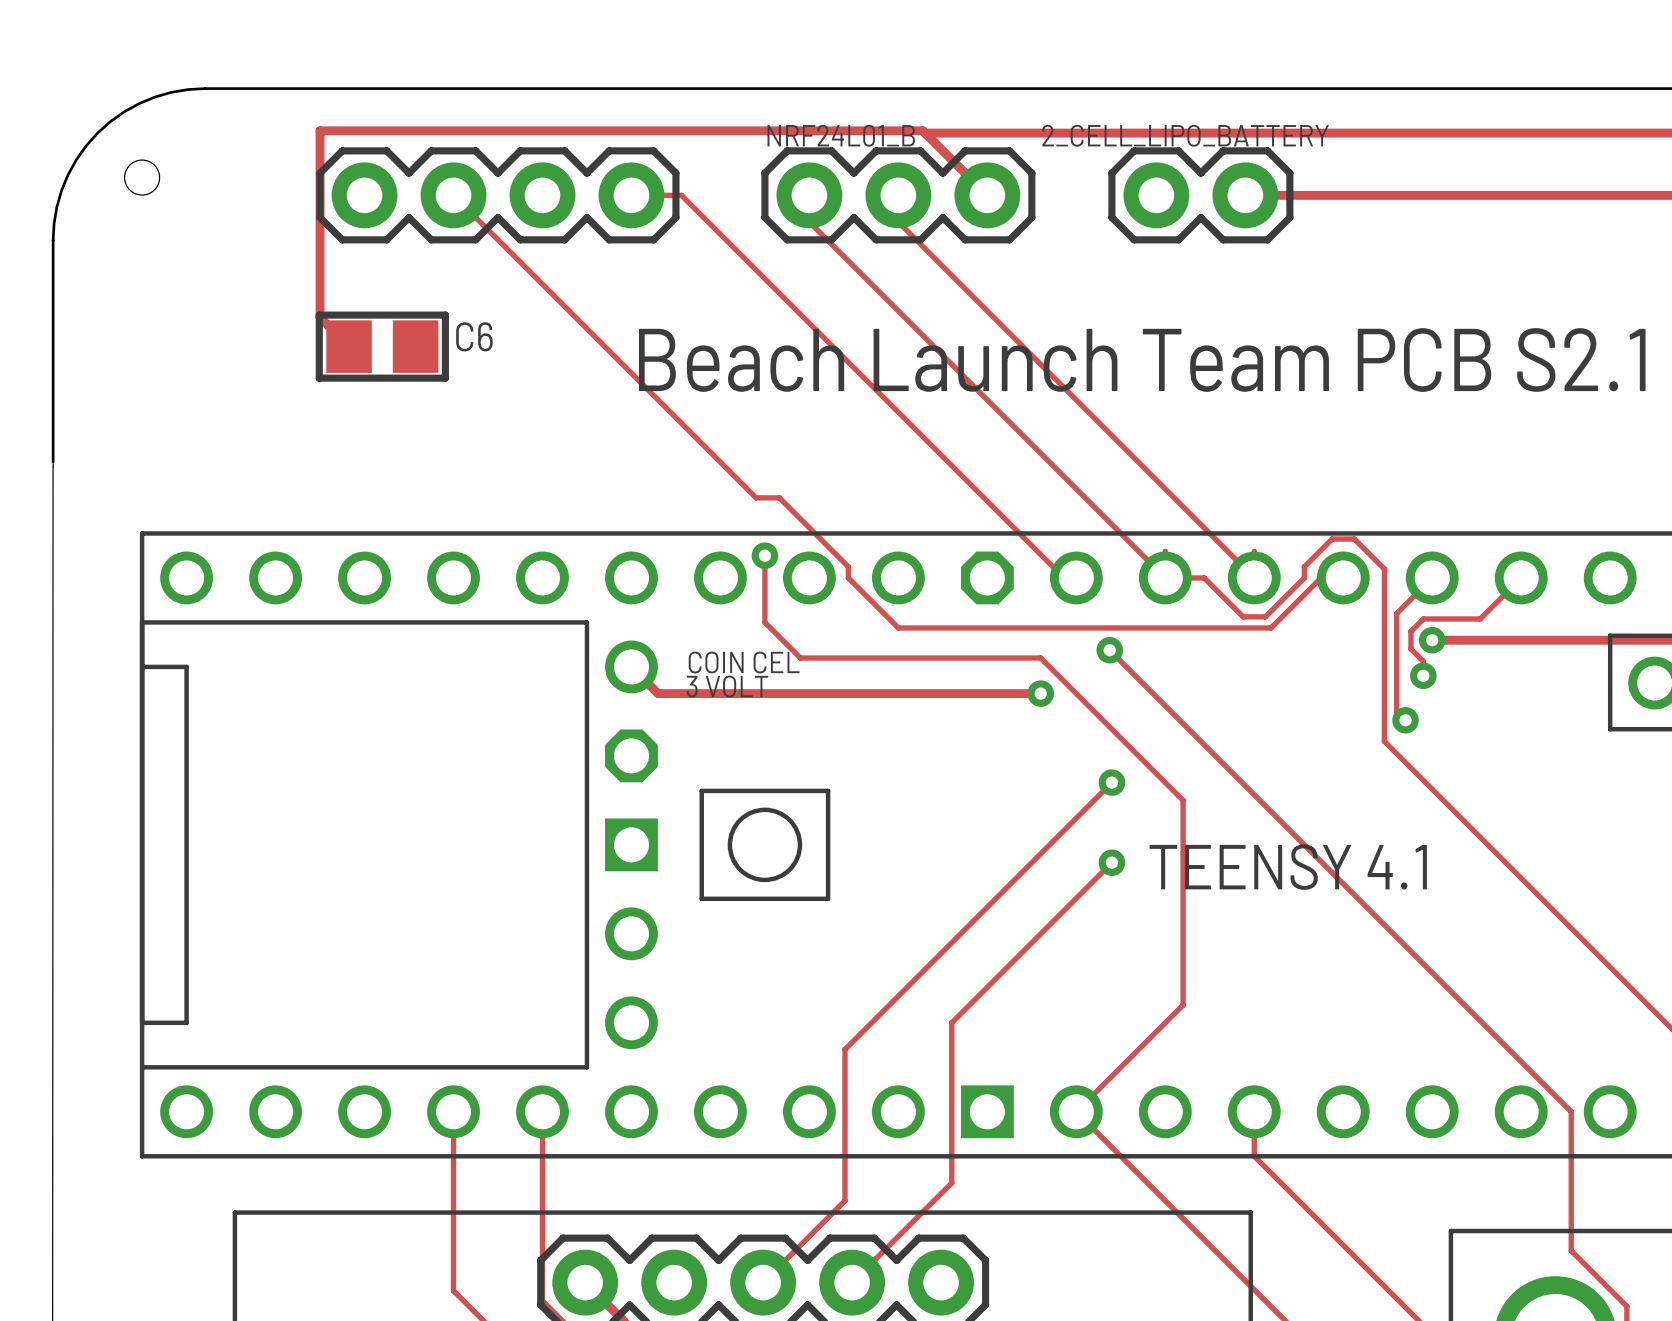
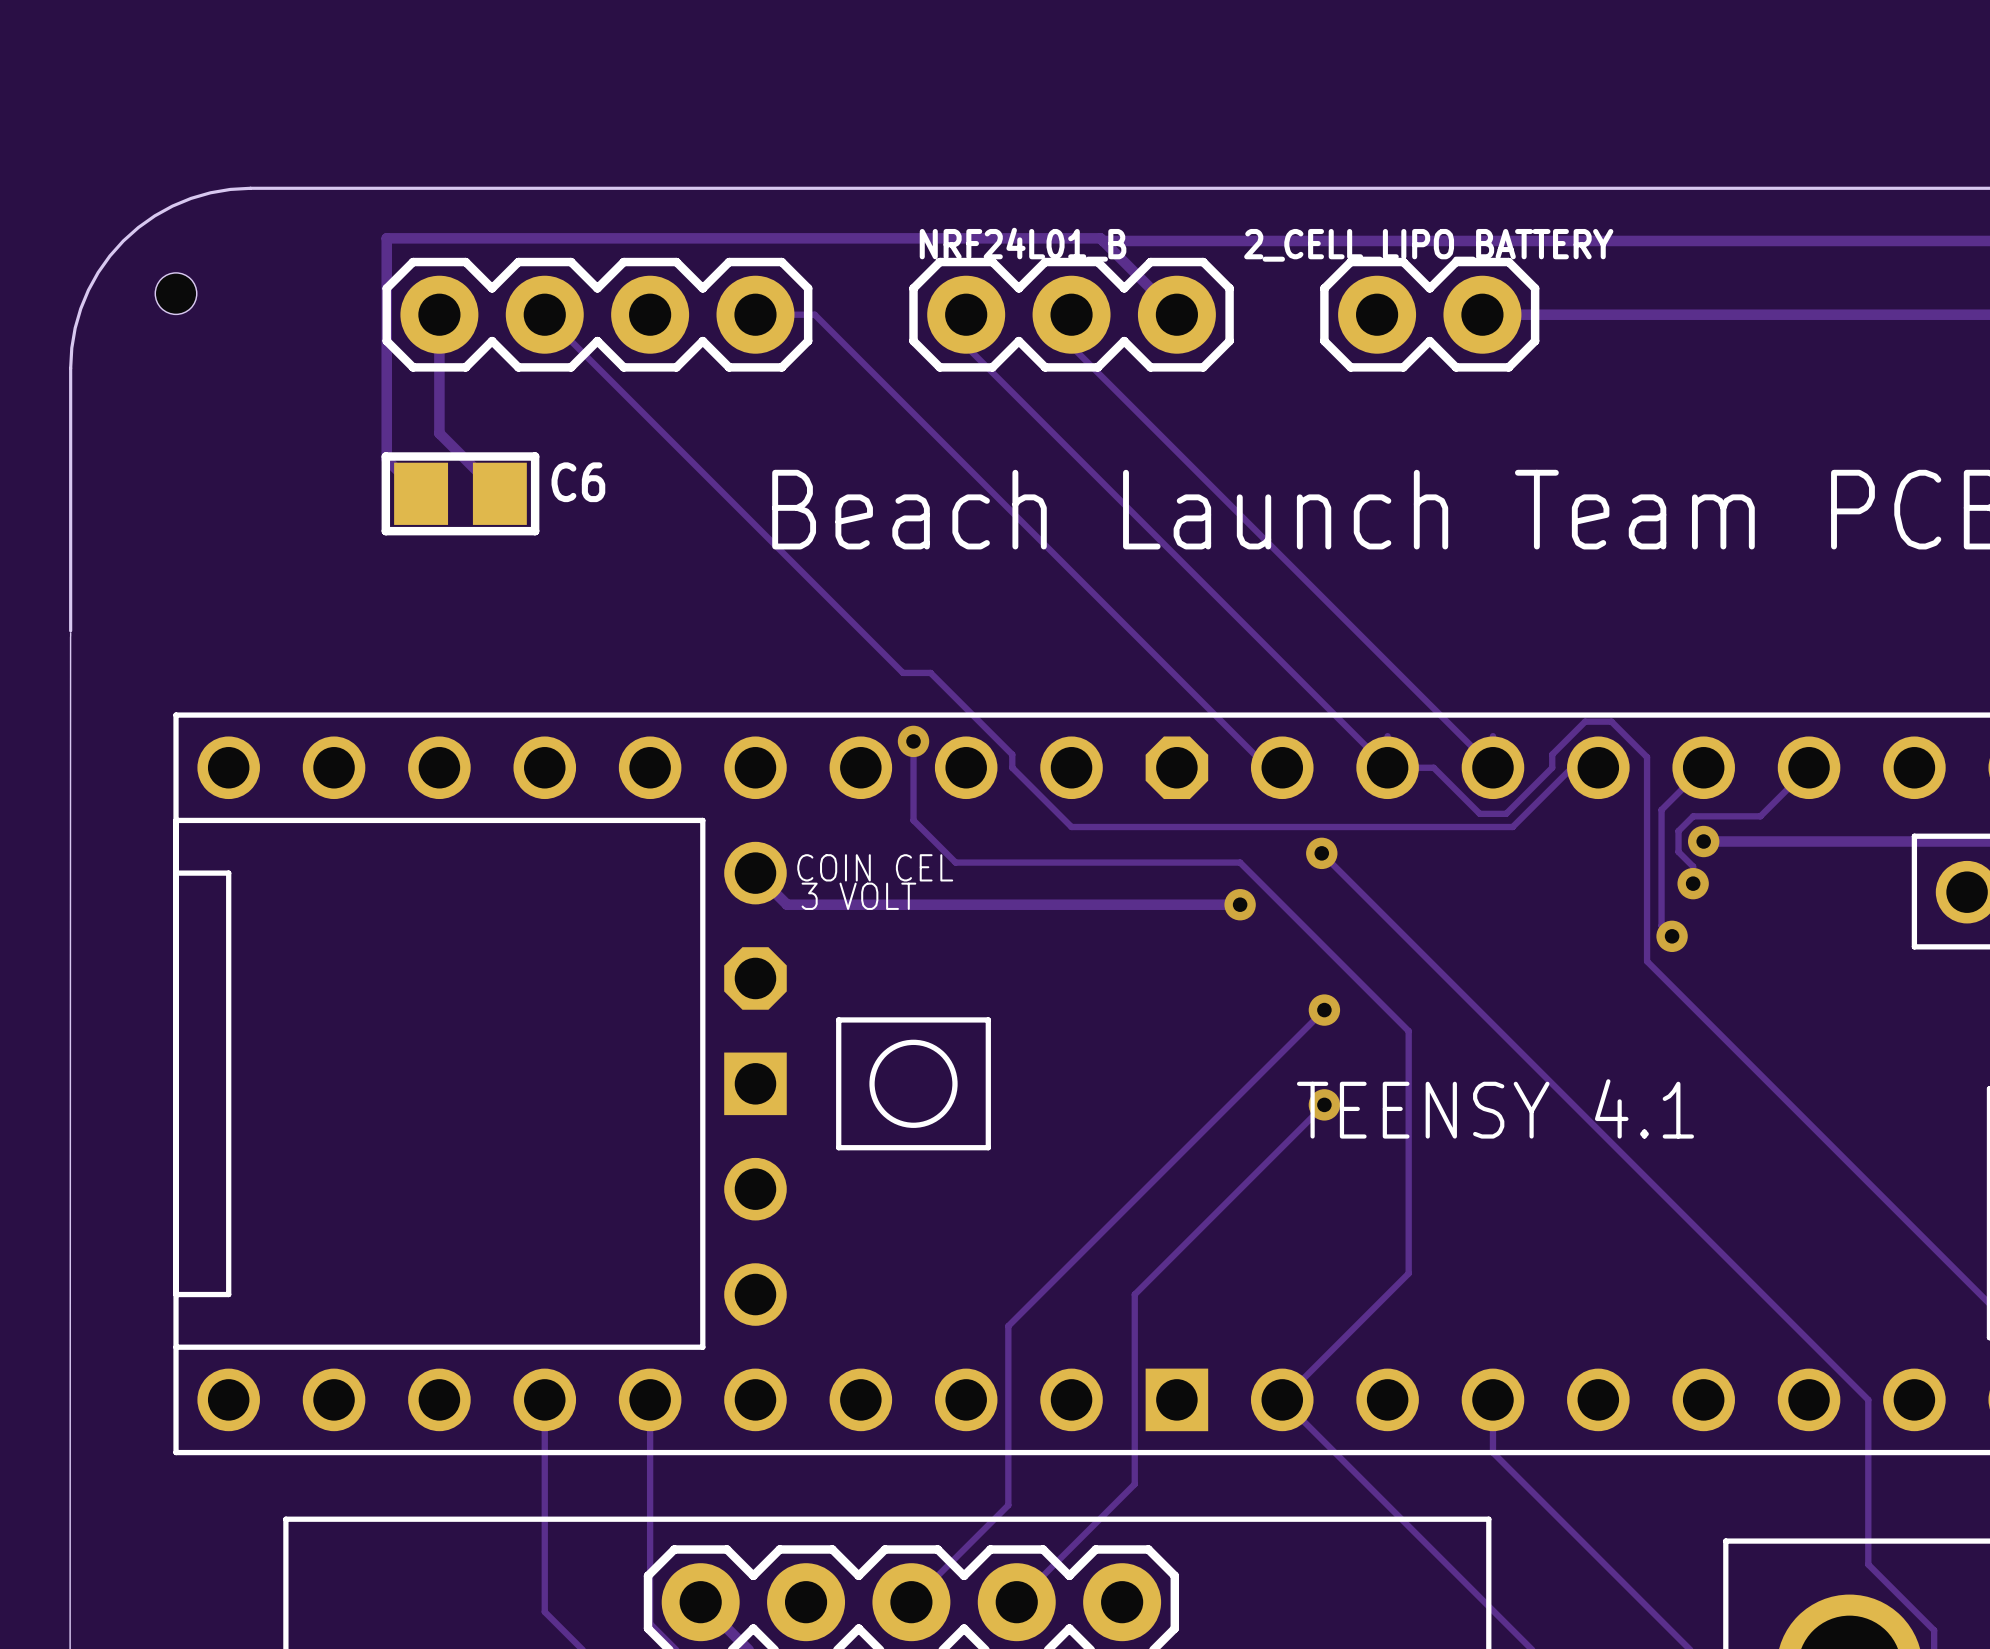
track: none -> (439, 314) (439, 433) (499, 493)

